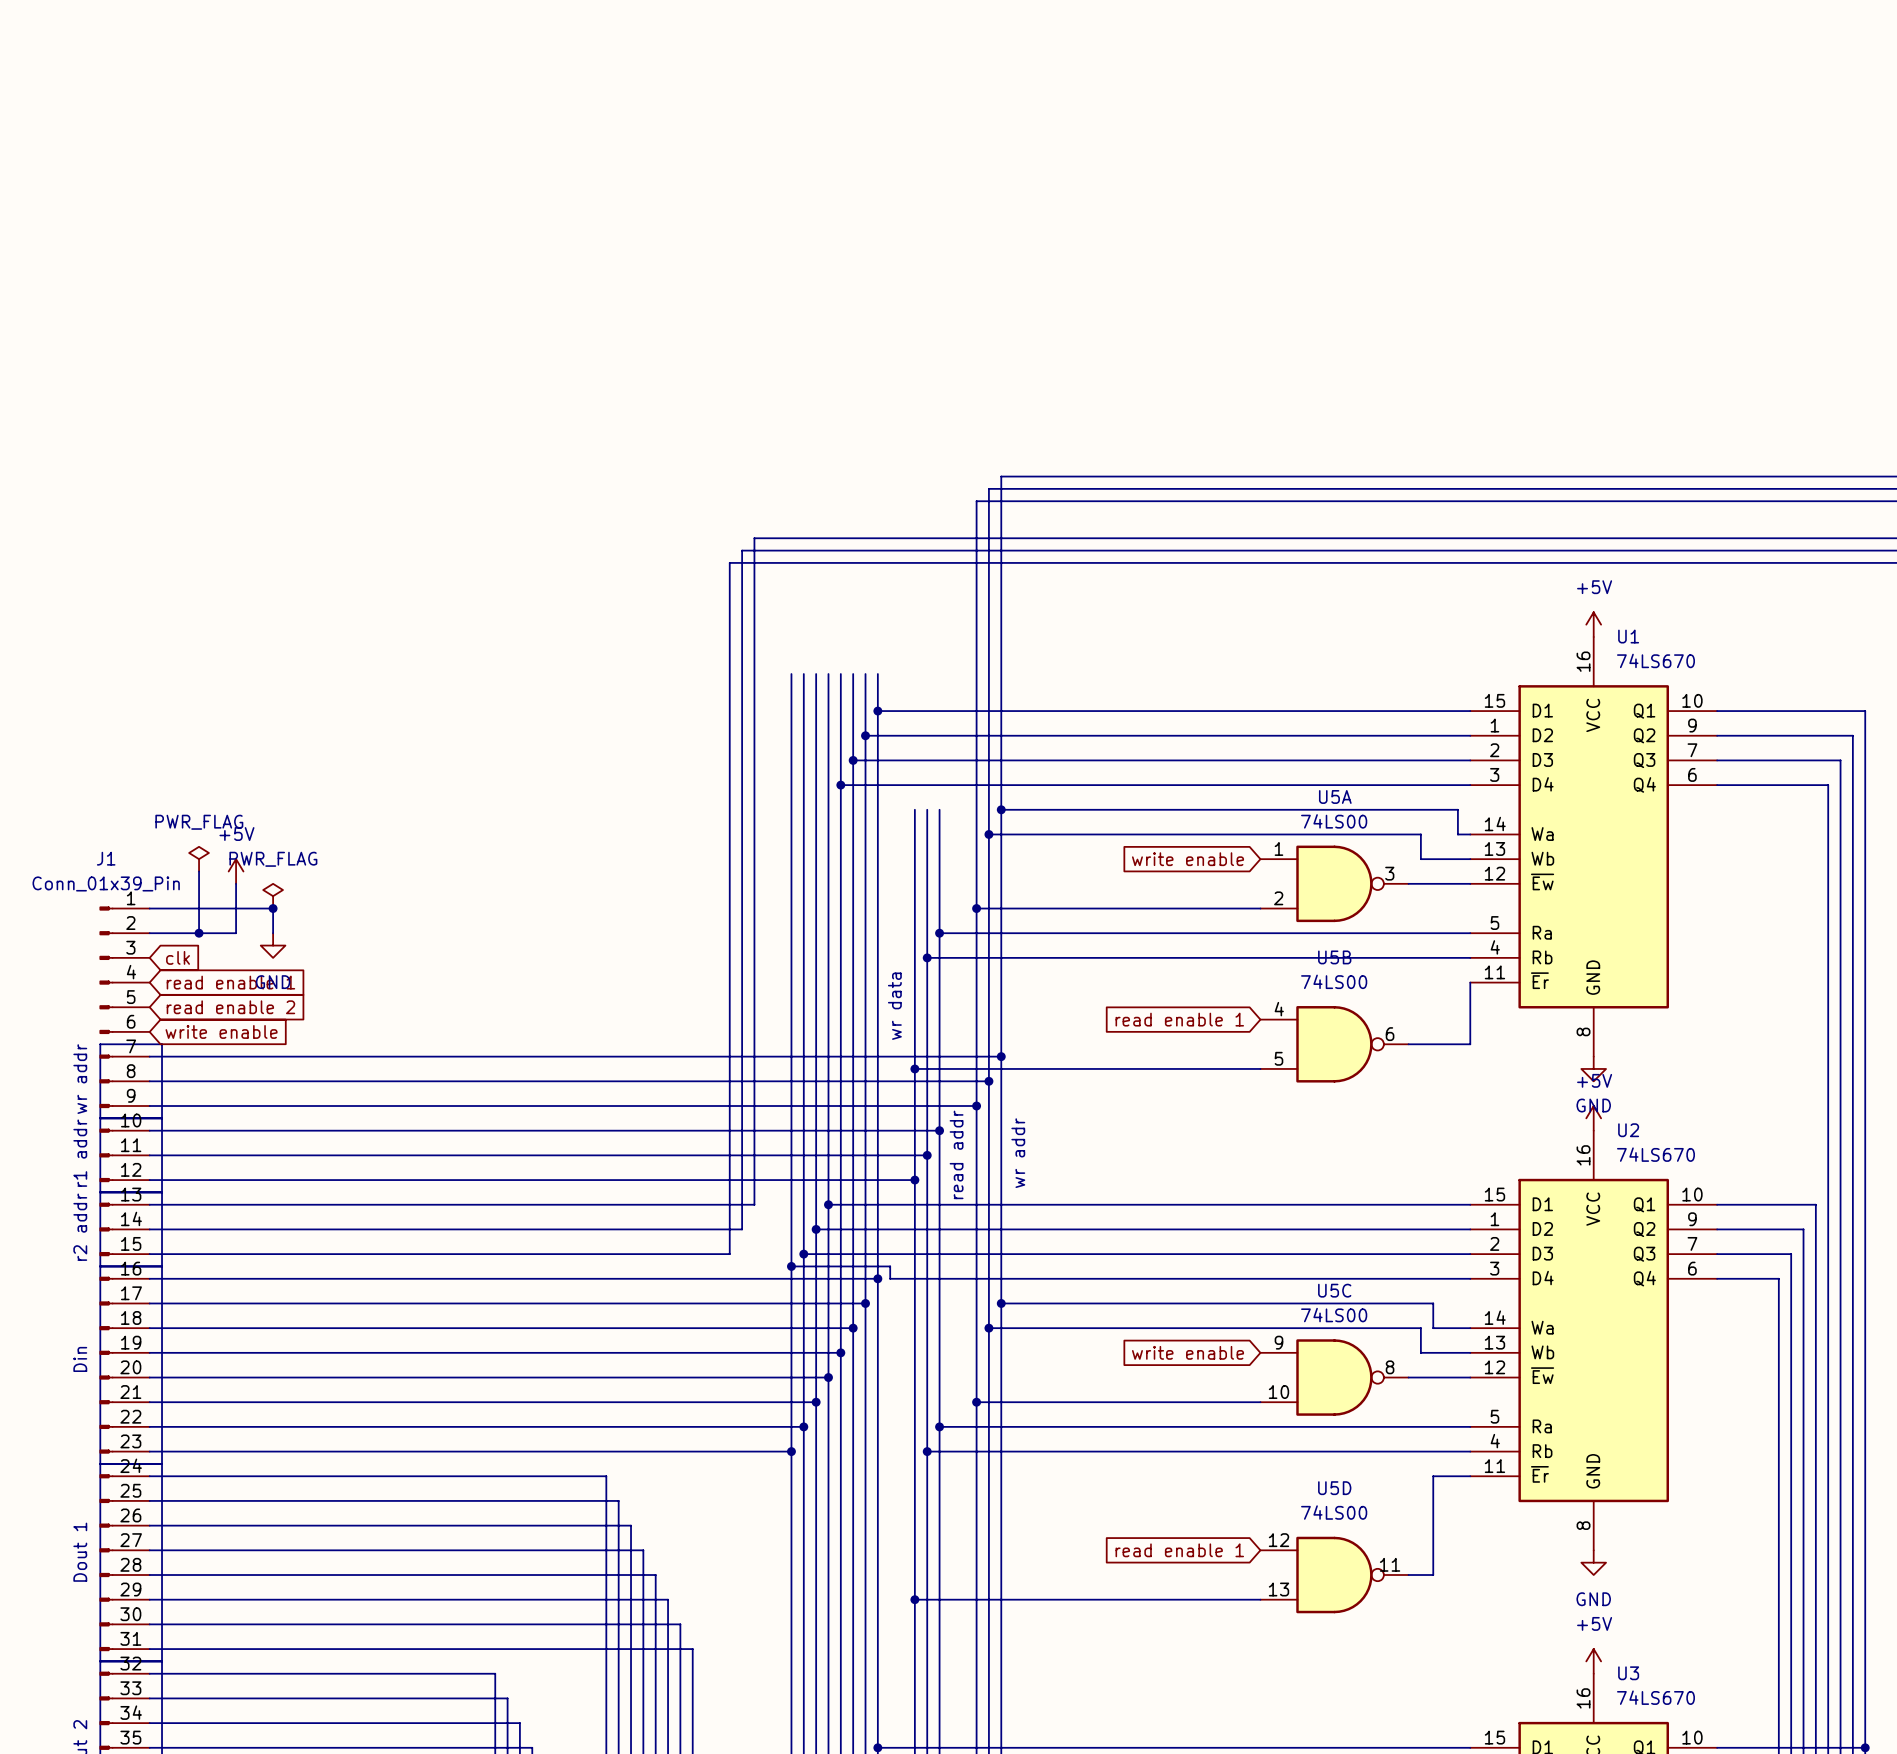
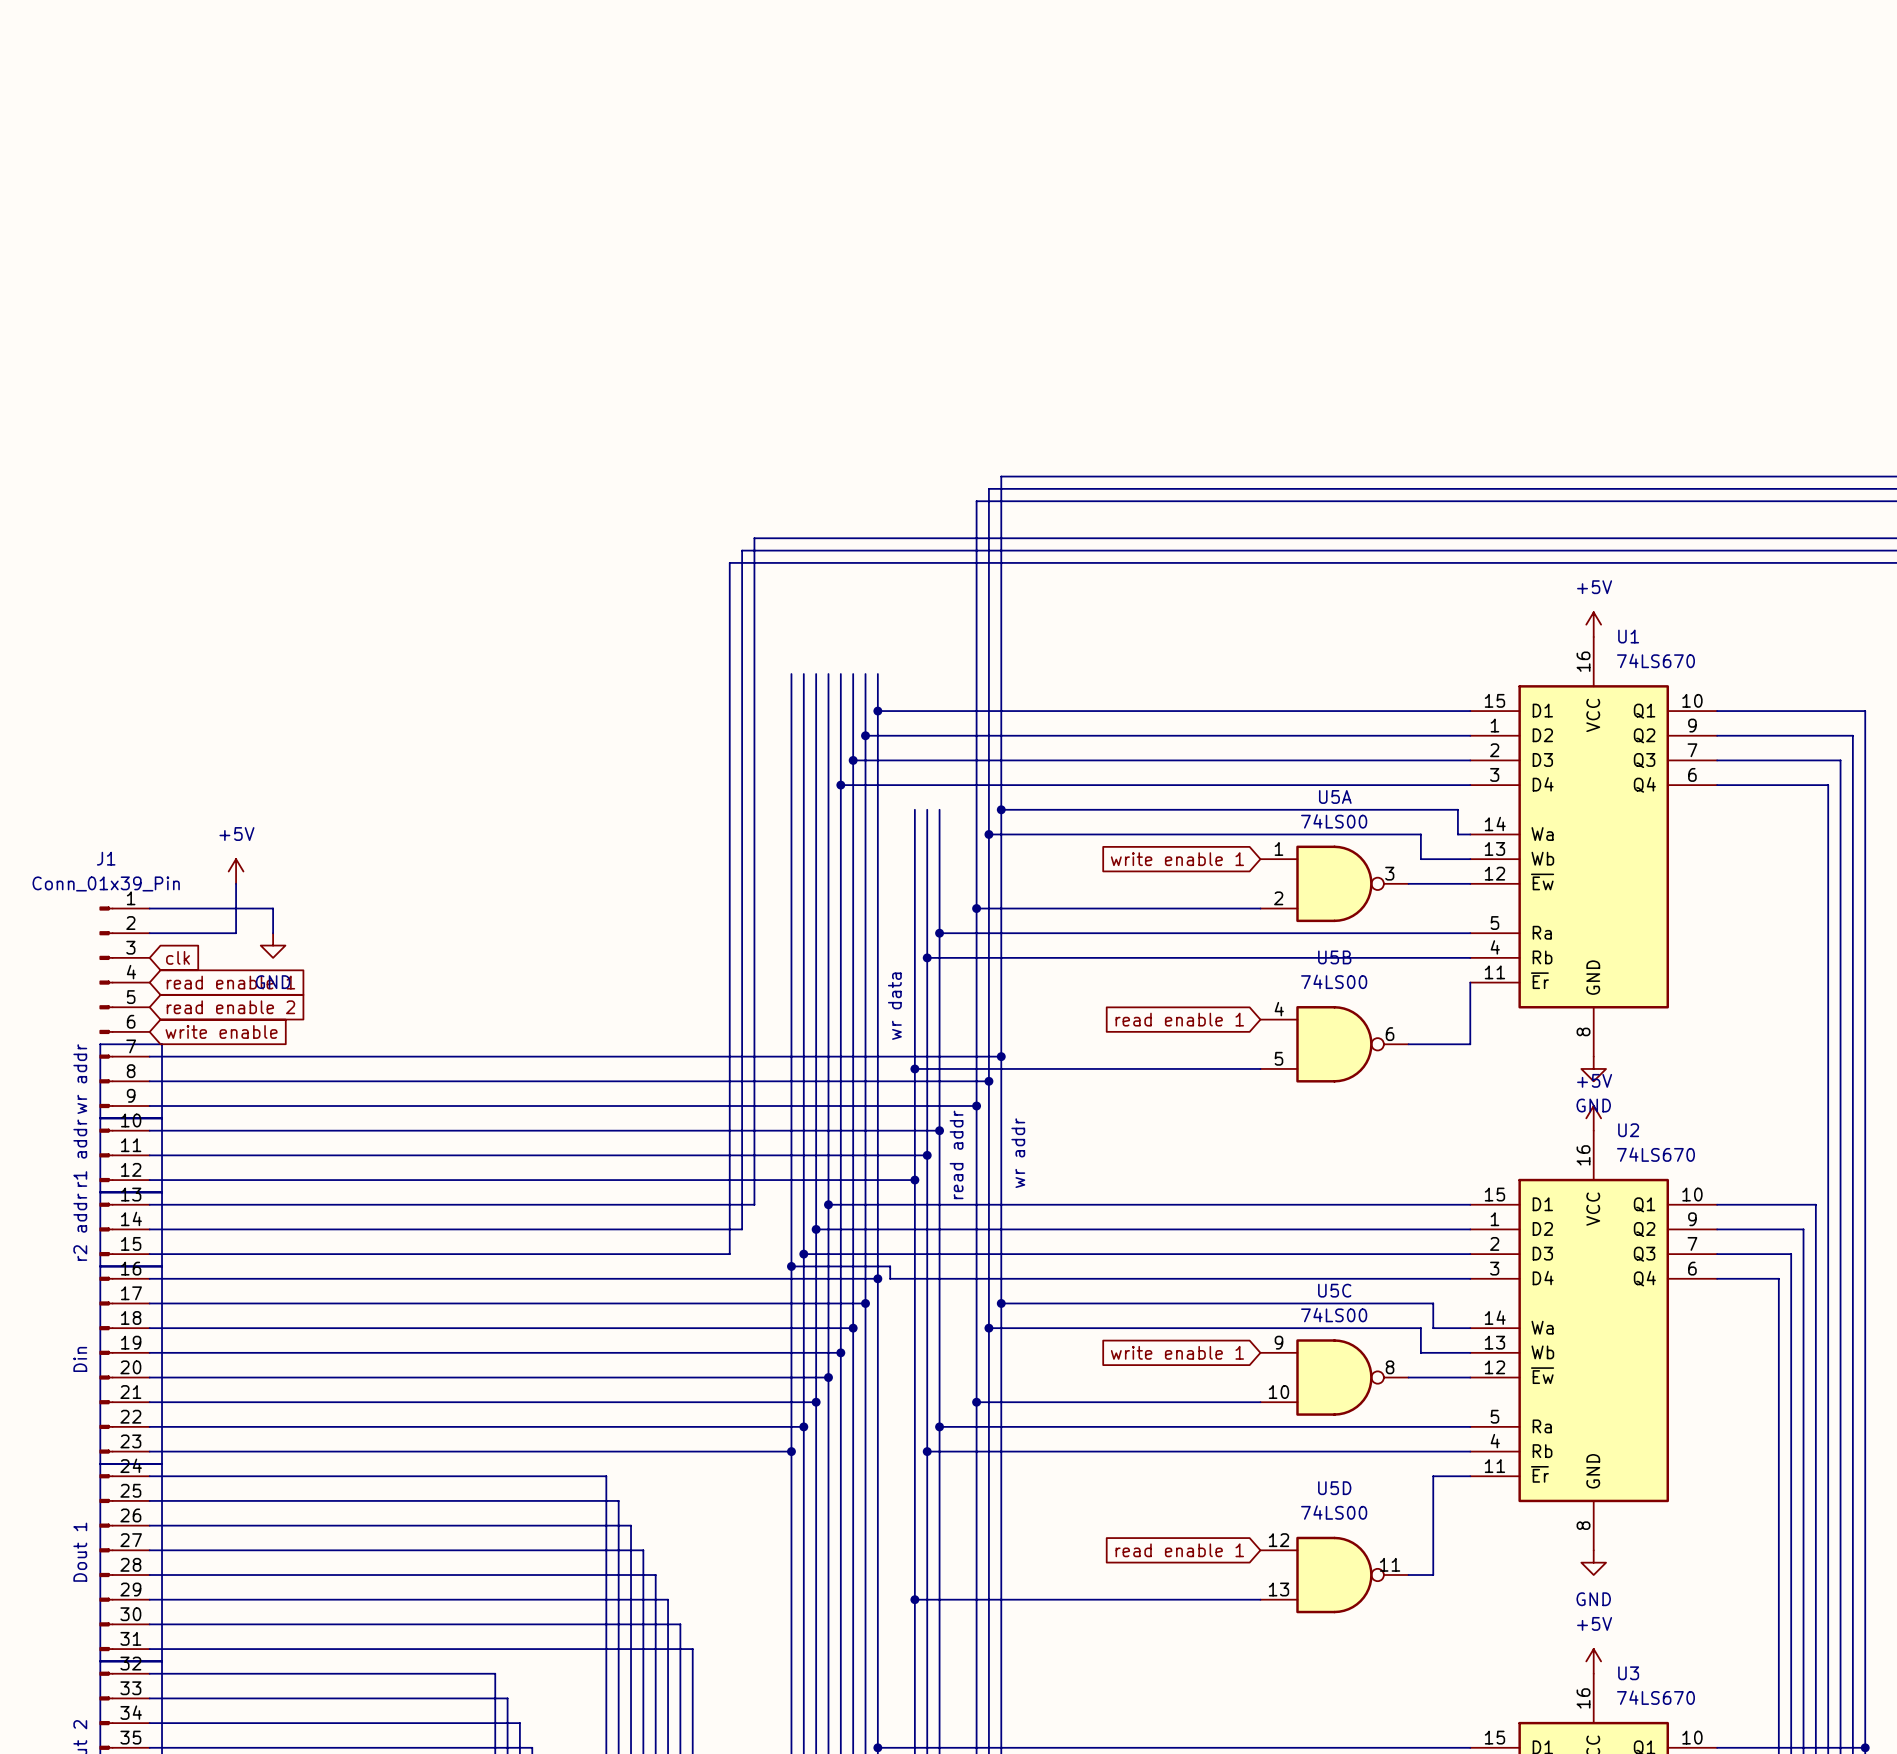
power symbol: PWR_FLAG (199, 859) -> none
global label: write enable (1188, 859) -> write enable 1 (1177, 859)
wire: (199, 871) (199, 933) -> none
power symbol: PWR_FLAG (273, 896) -> none
junction: (273, 908) -> none
junction: (199, 933) -> none
global label: write enable (1188, 1352) -> write enable 1 (1177, 1352)

